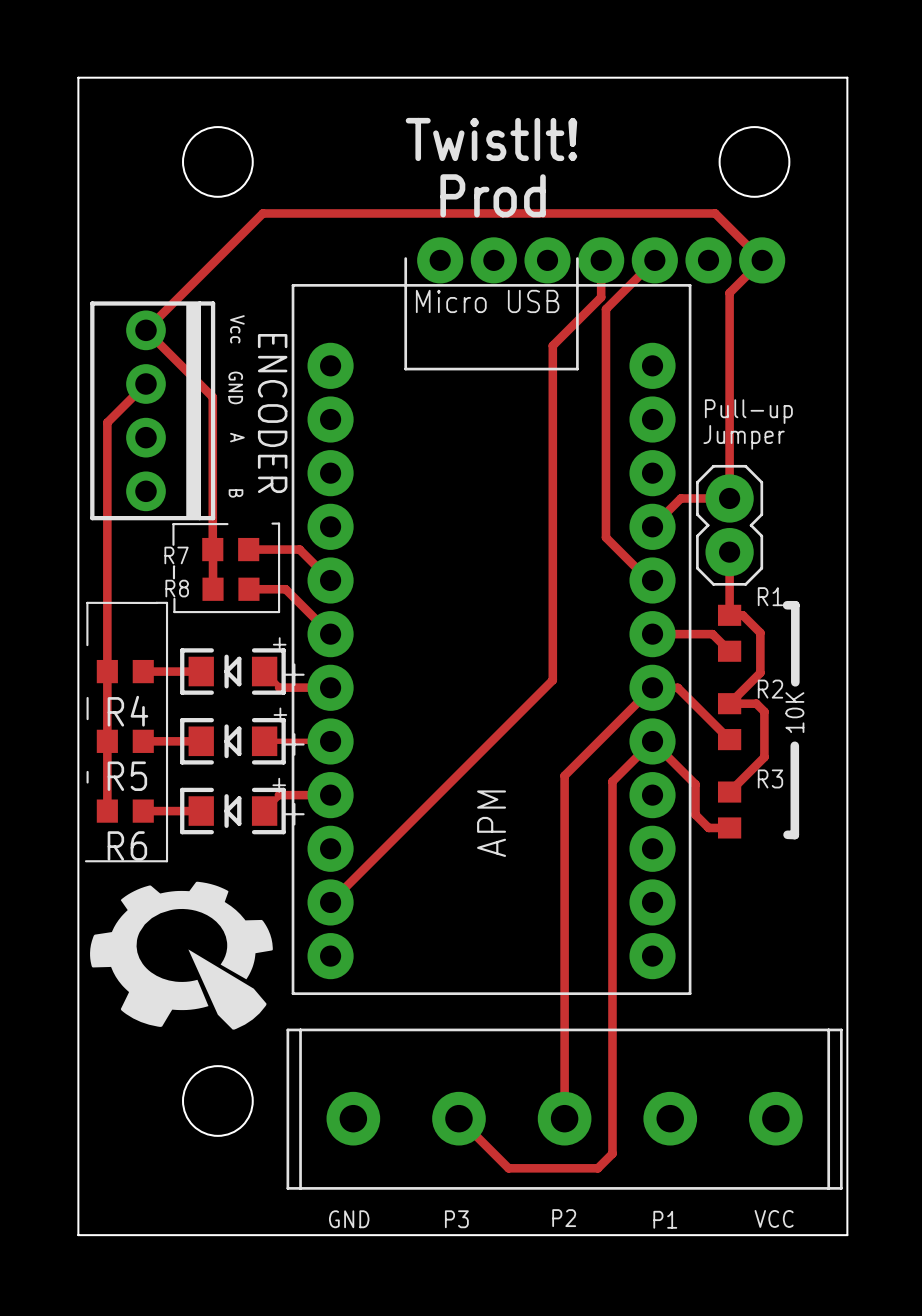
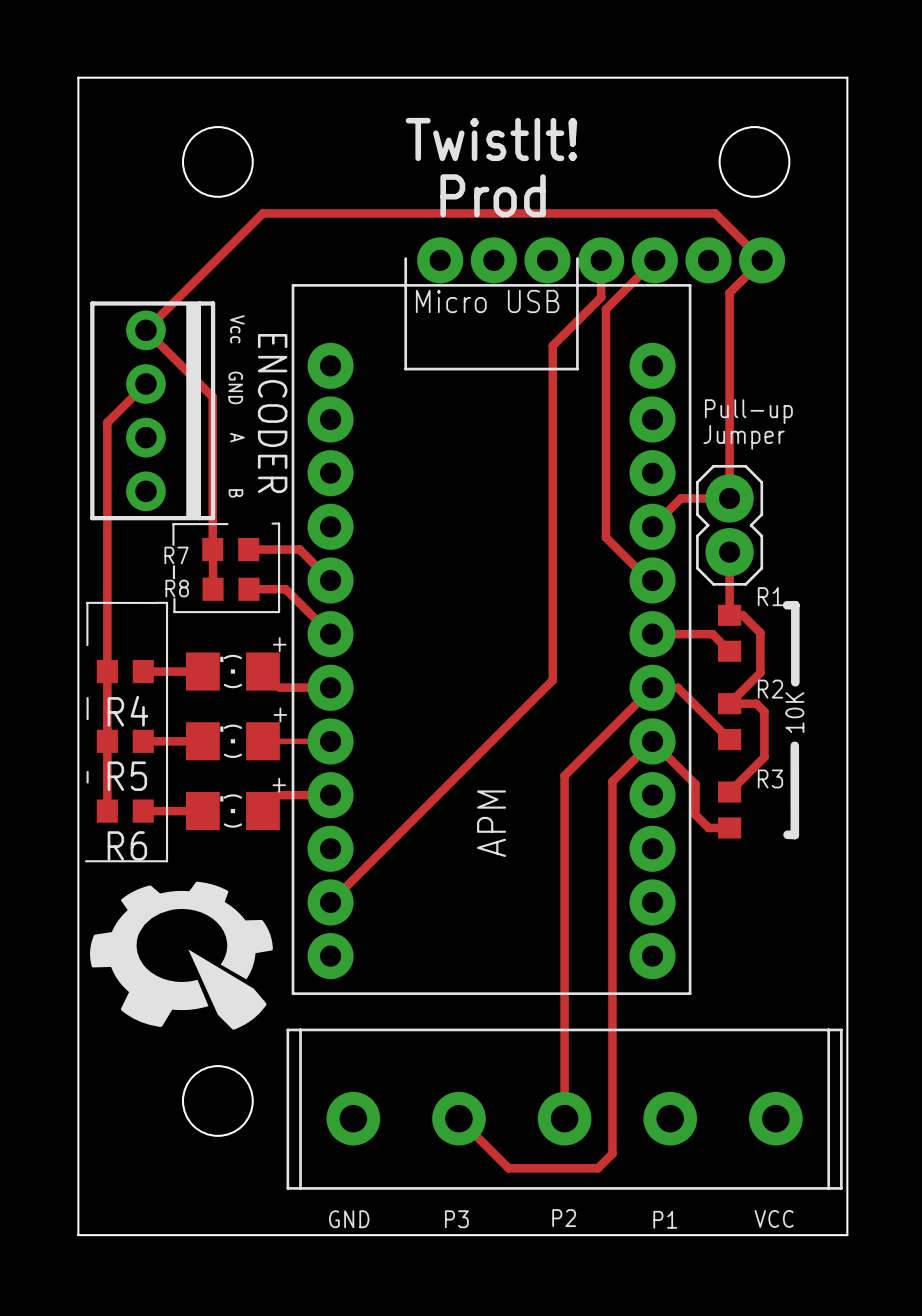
part footprint: [180, 648, 286, 695] -> [185, 652, 280, 691]
part footprint: [180, 718, 286, 765] -> [185, 722, 280, 761]
part footprint: [180, 787, 286, 835] -> [185, 791, 280, 831]

